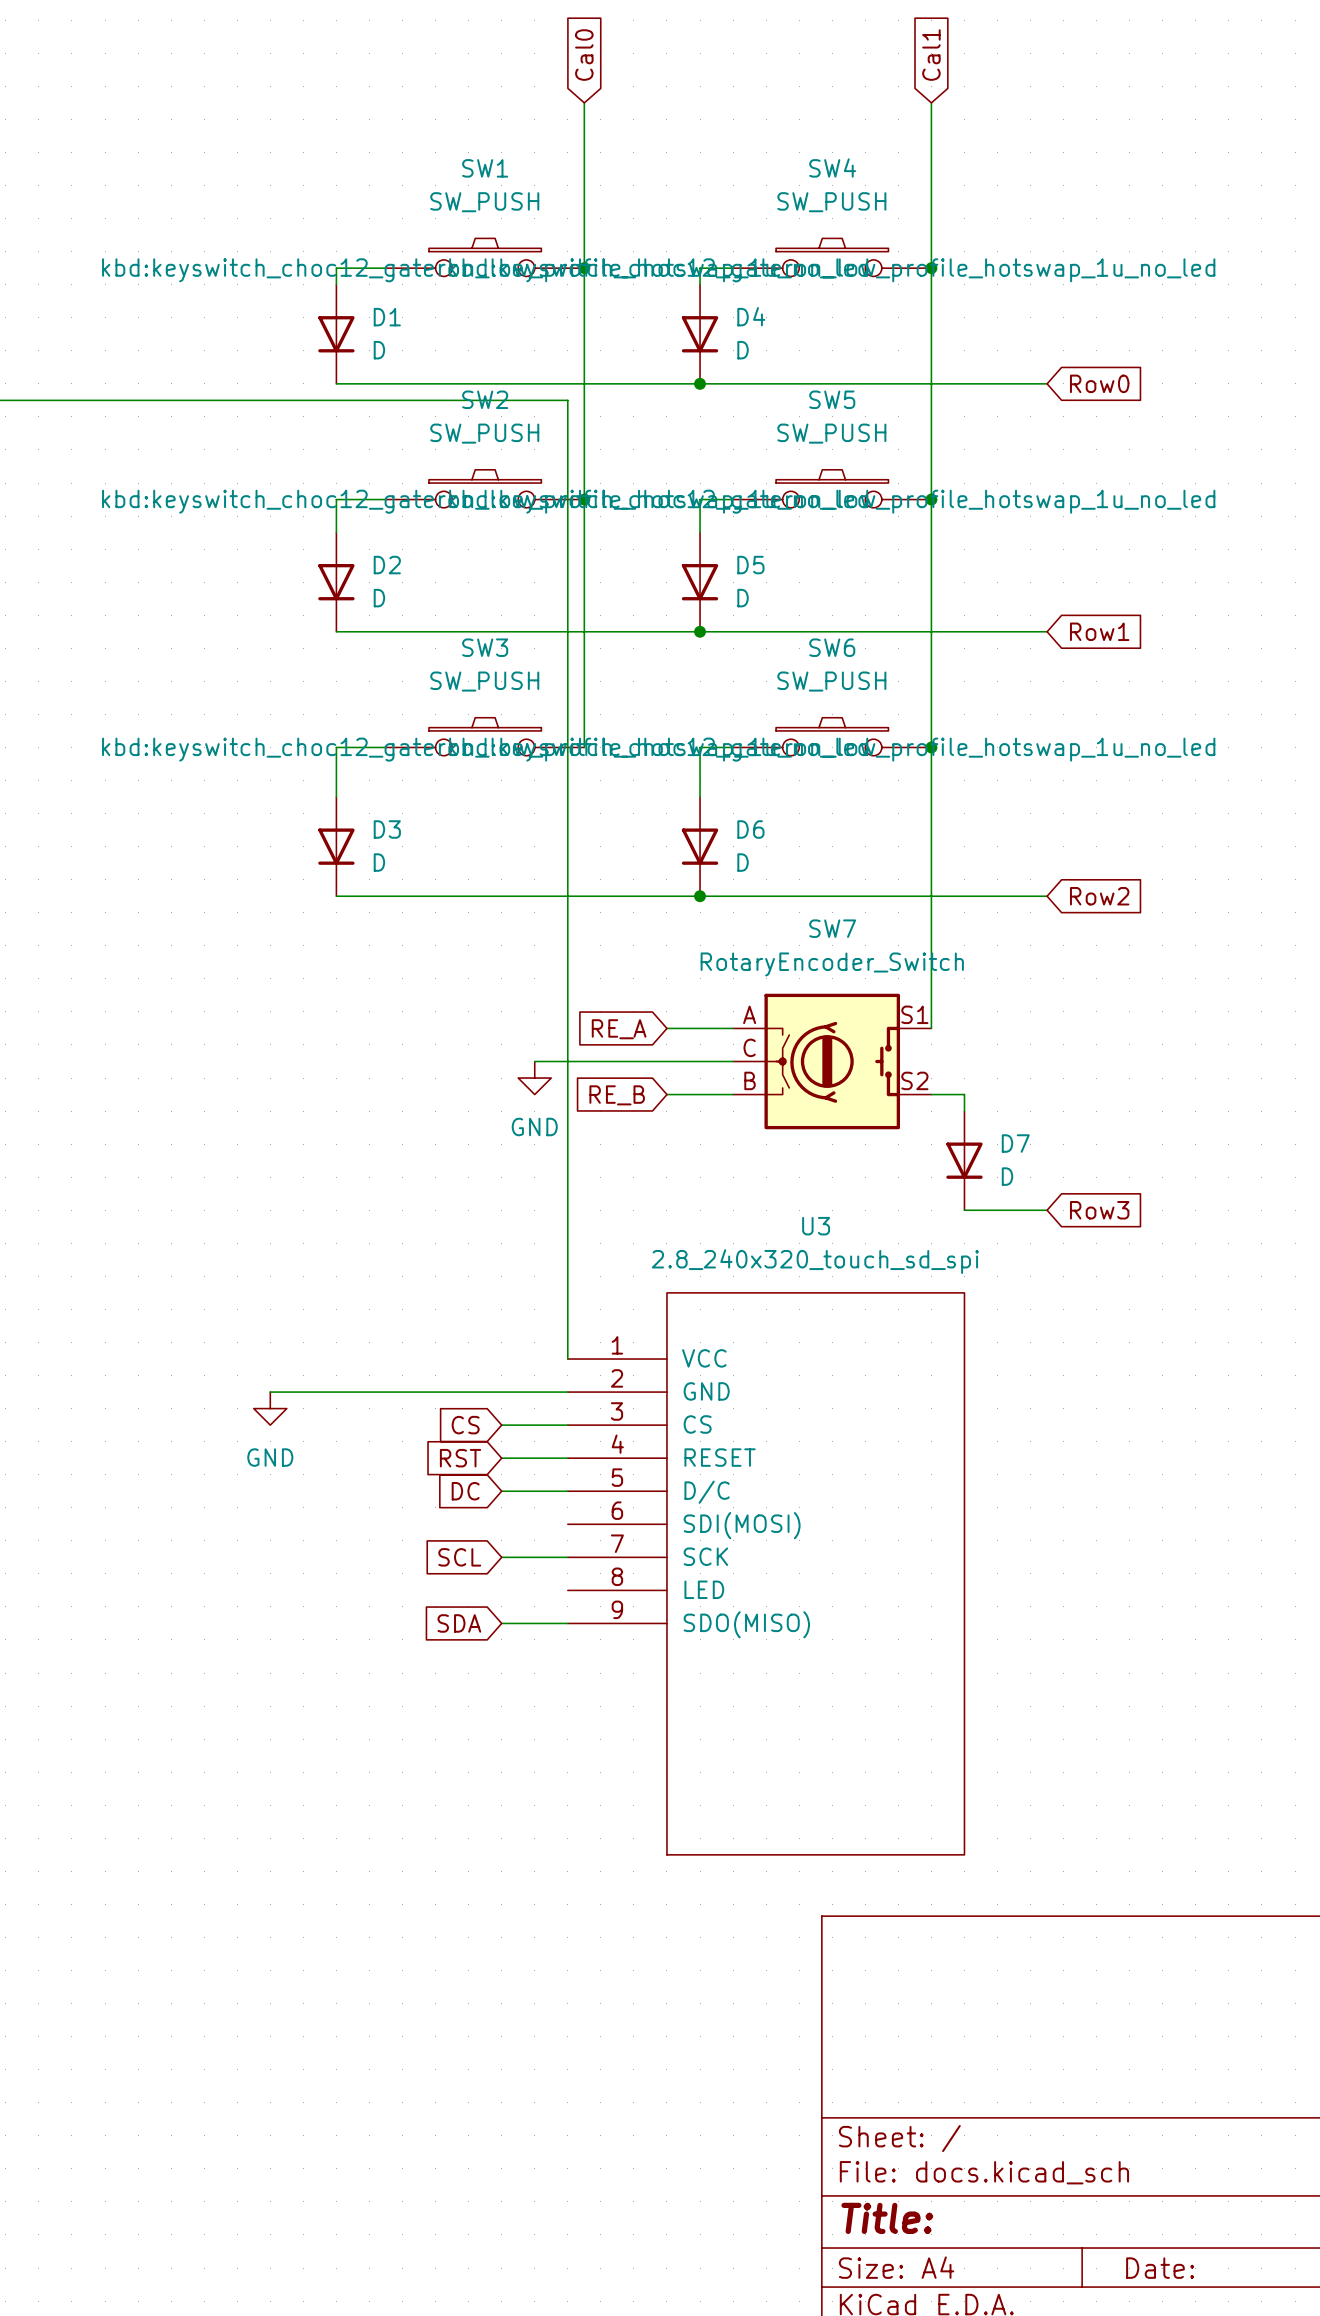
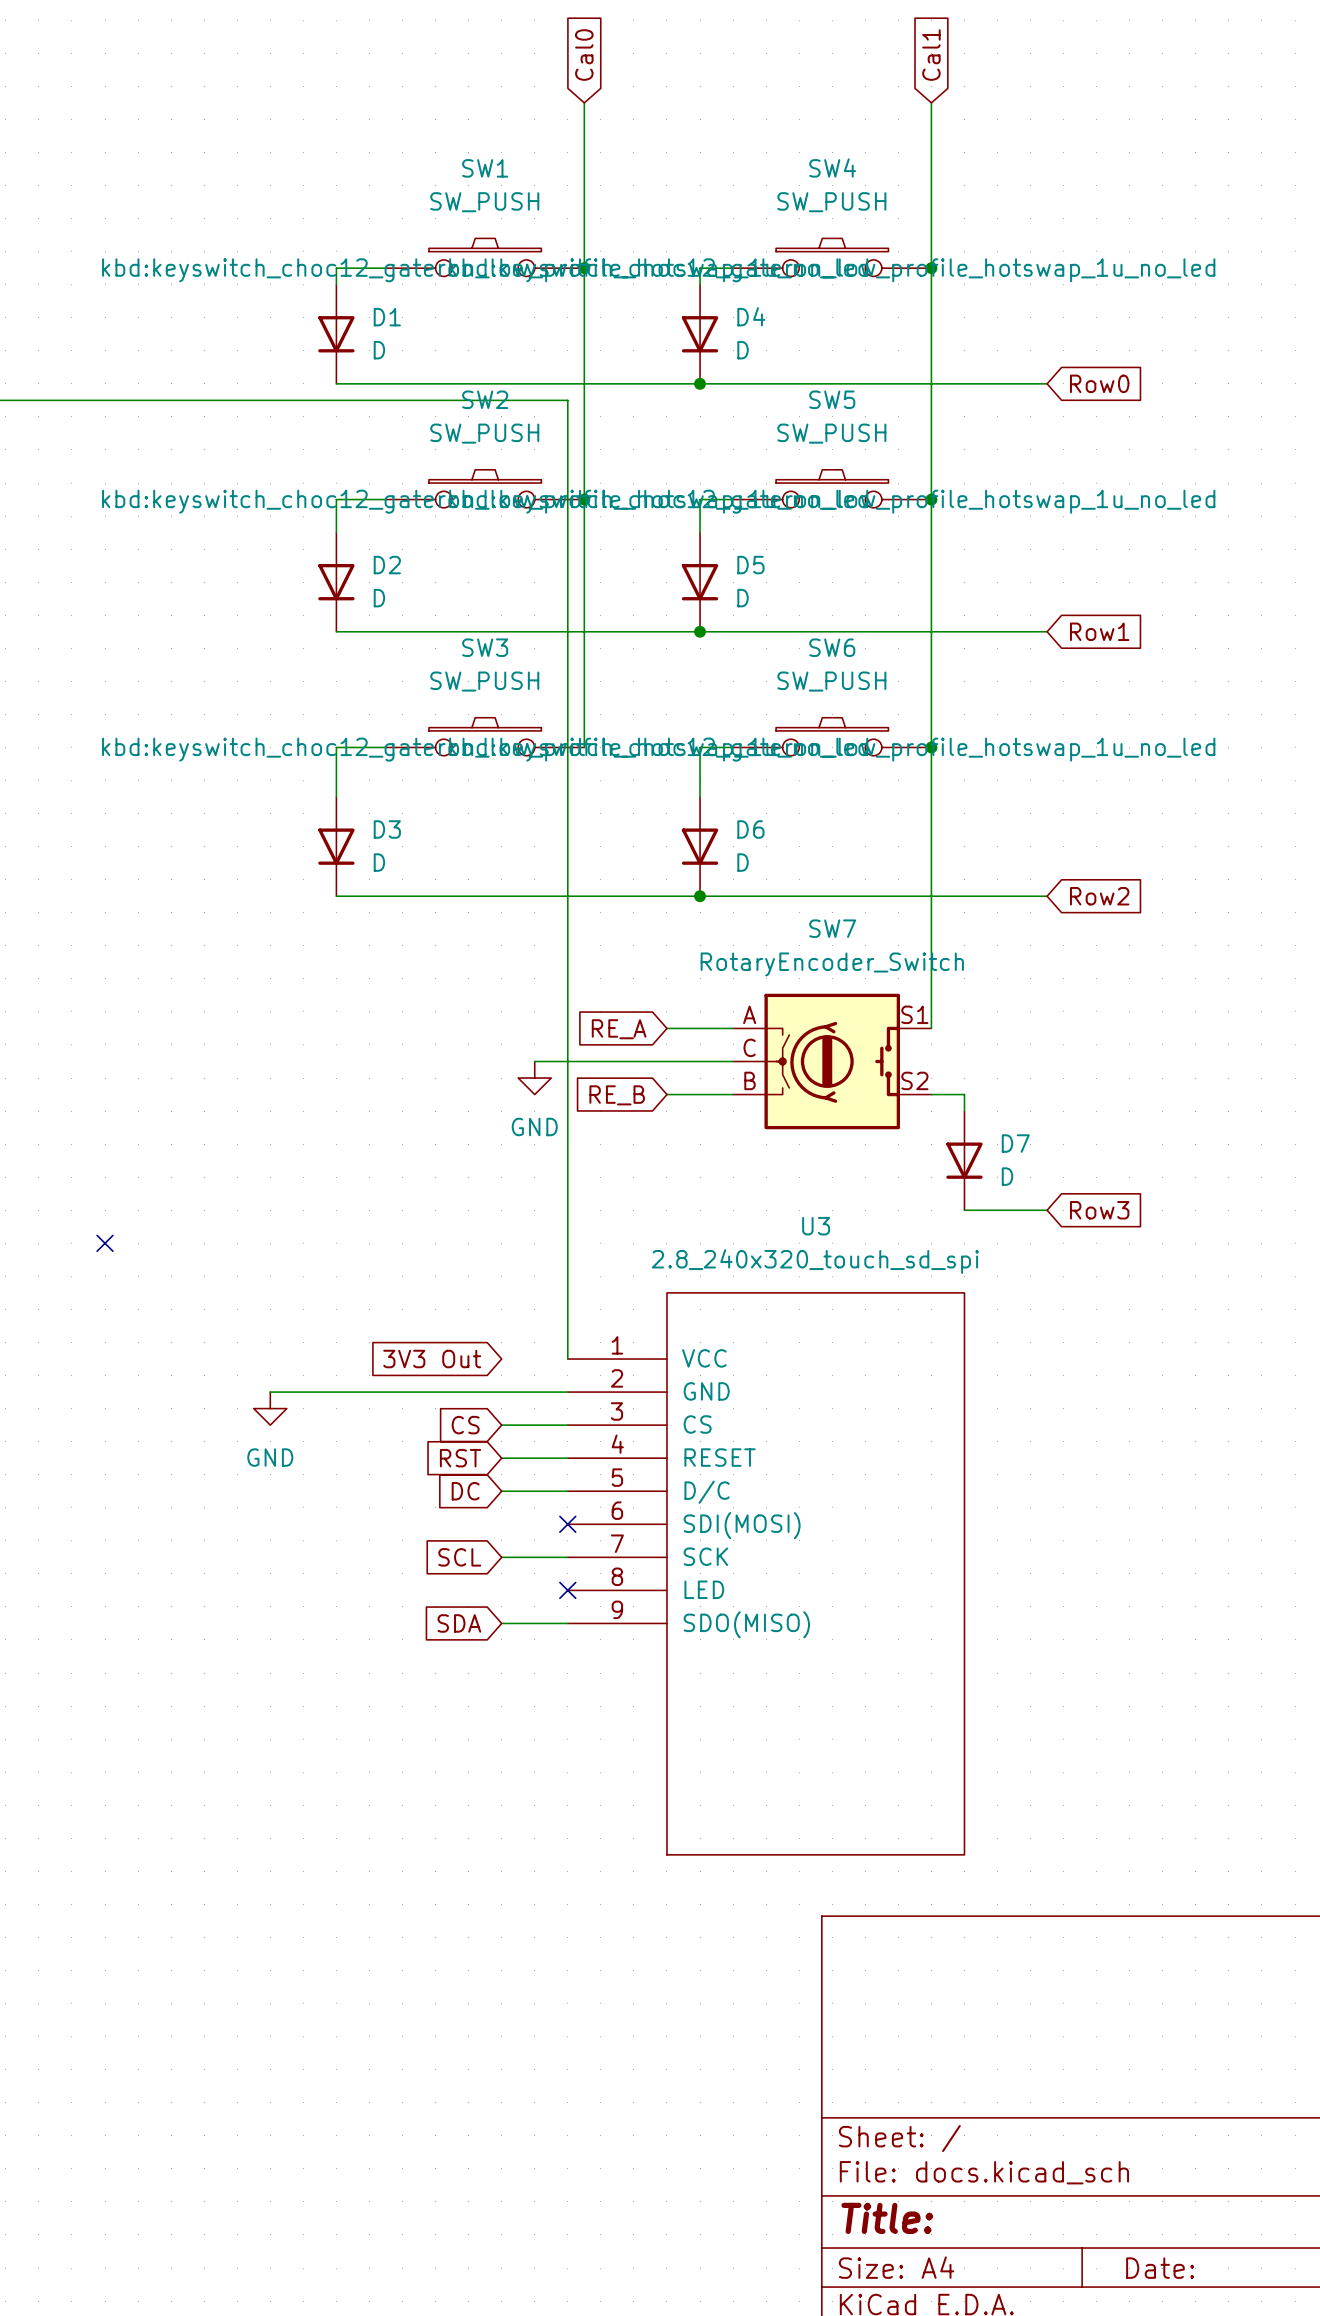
no-connect mark: none -> (105, 1243)
global label: none -> 3V3 Out (432, 1359)
no-connect mark: none -> (567, 1524)
no-connect mark: none -> (567, 1590)

